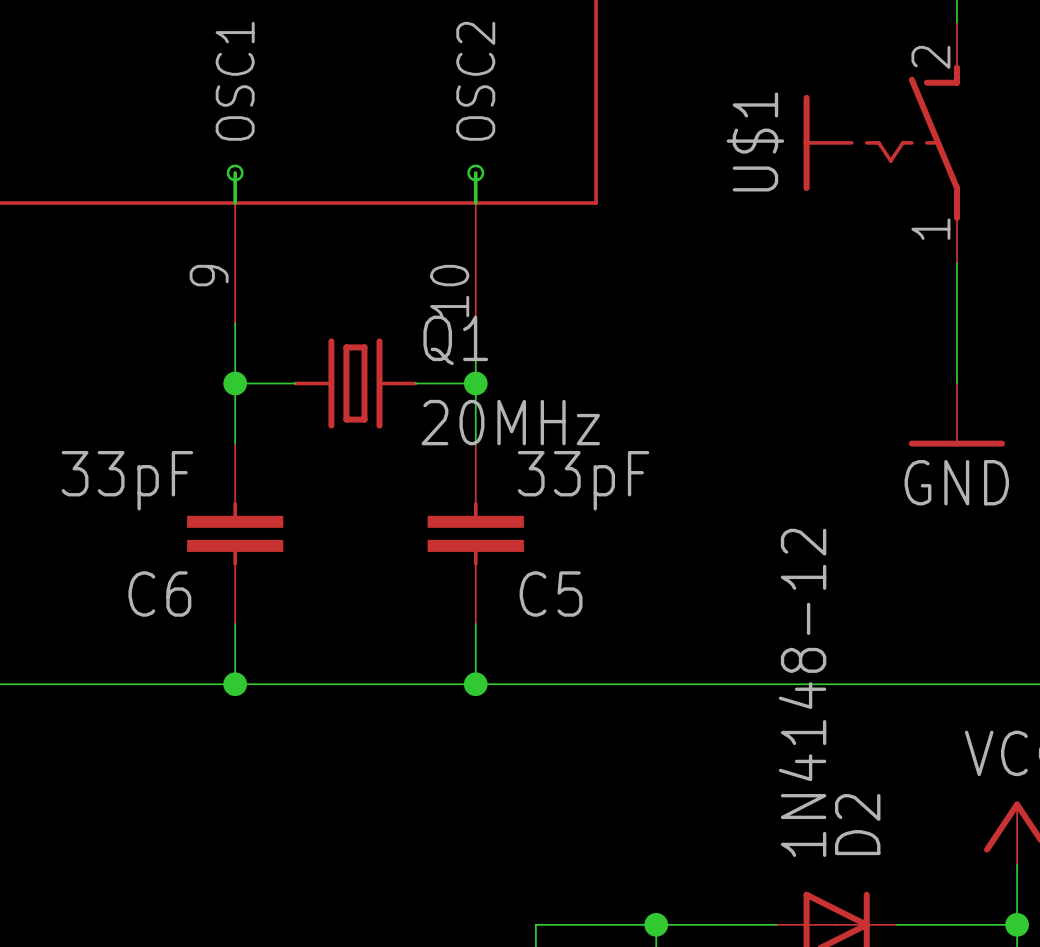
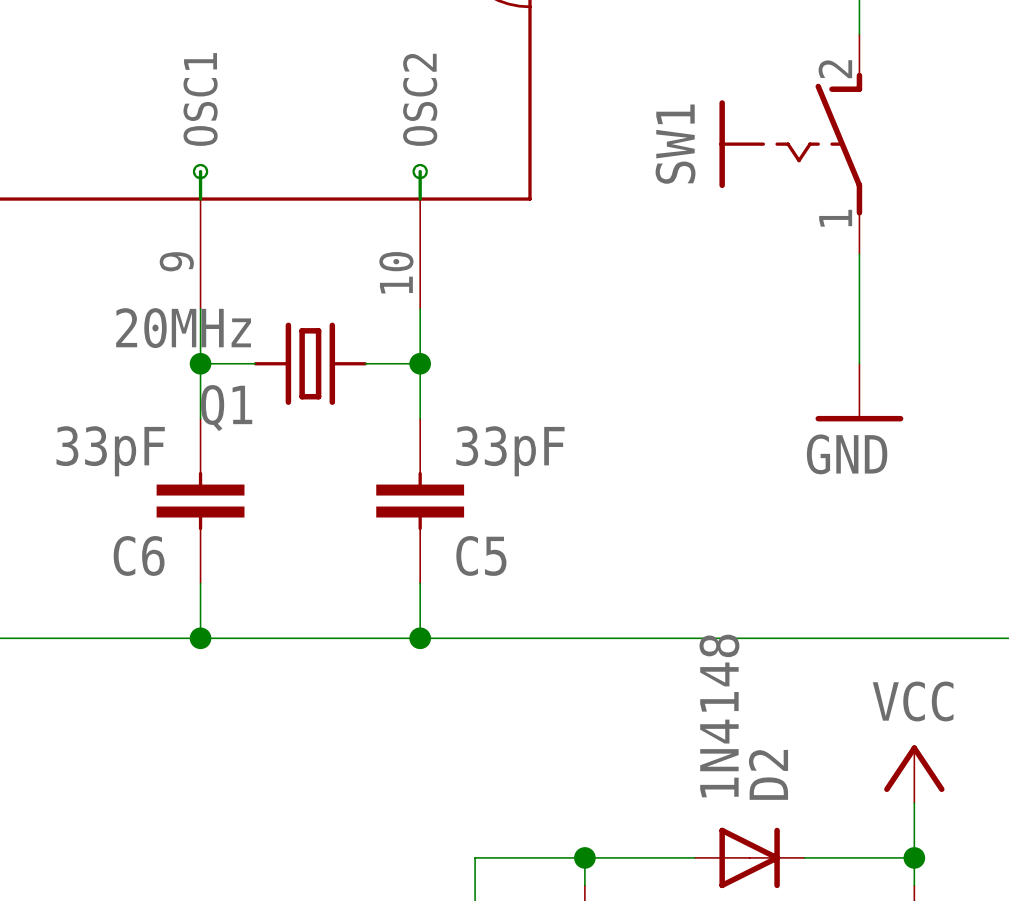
U$1 name: U$1 (755, 141) -> SW1 (675, 144)
Q1 name position: Q1 (455, 340) -> Q1 (226, 408)
Q1 value position: 20MHz (510, 422) -> 20MHz (183, 328)
D2 value: 1N4148-12 (802, 692) -> 1N4148 (719, 715)

